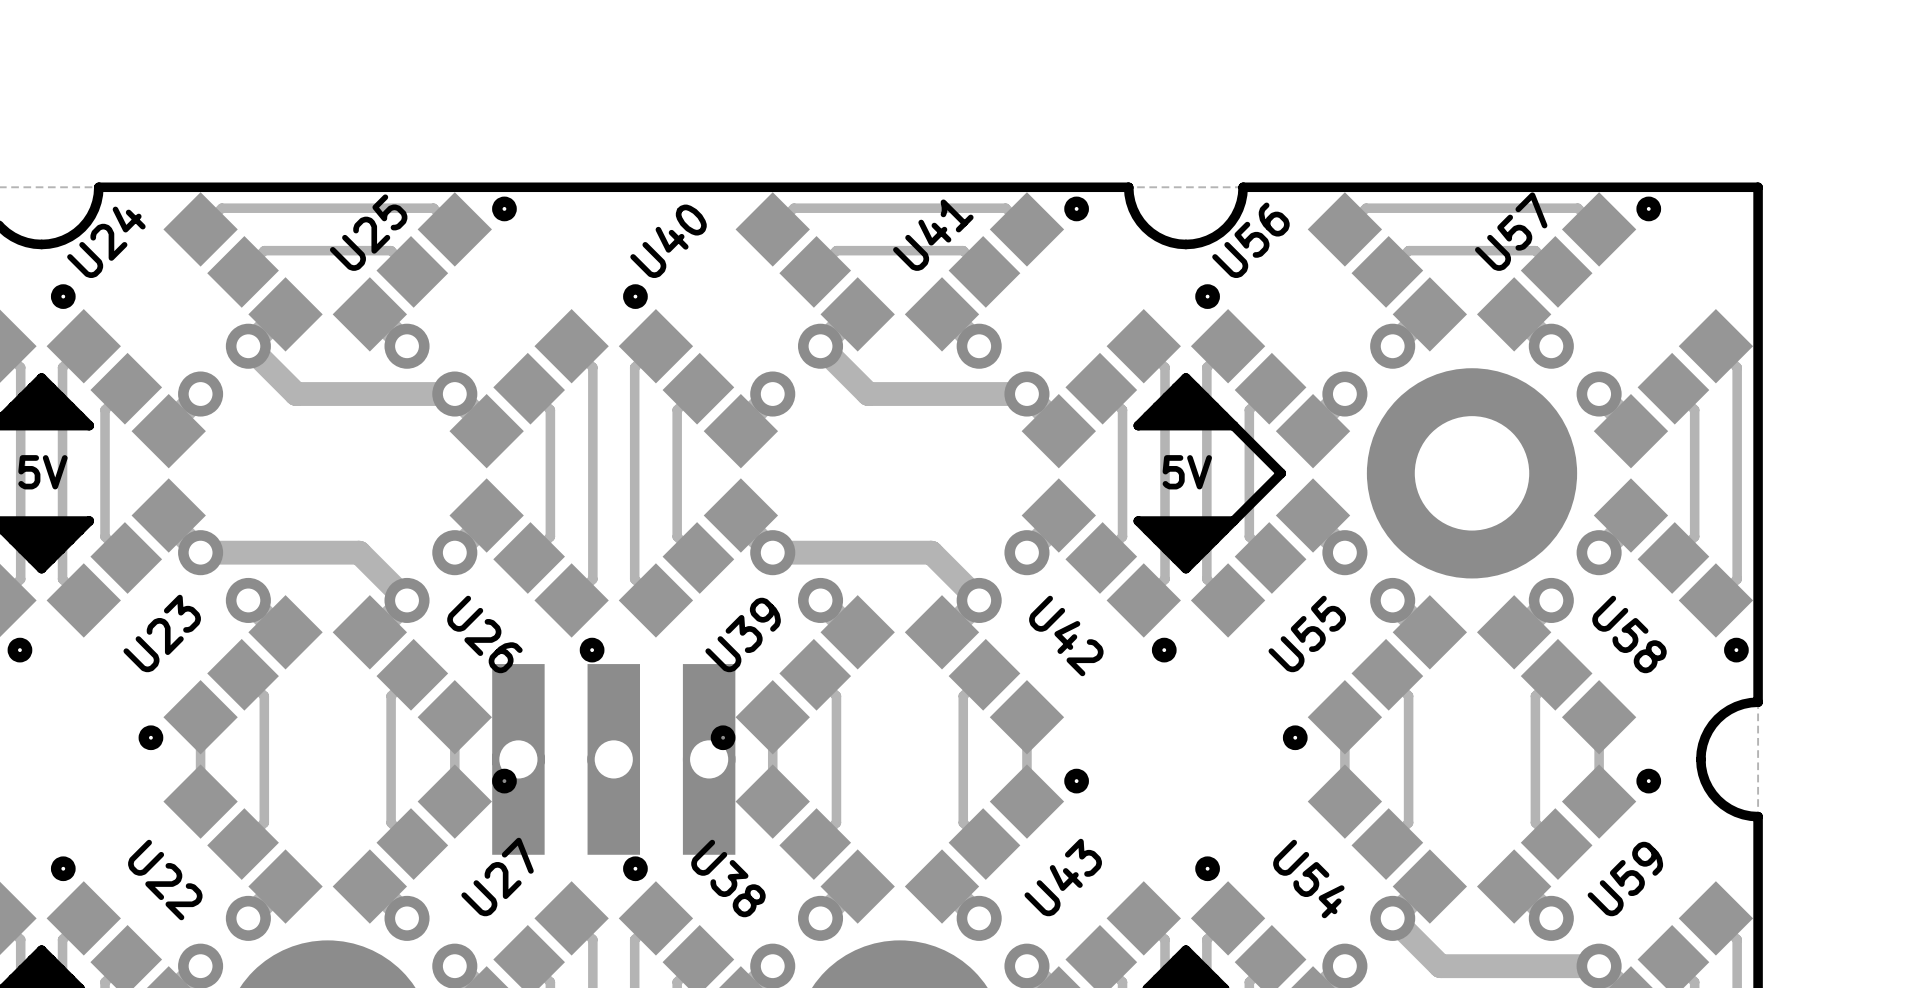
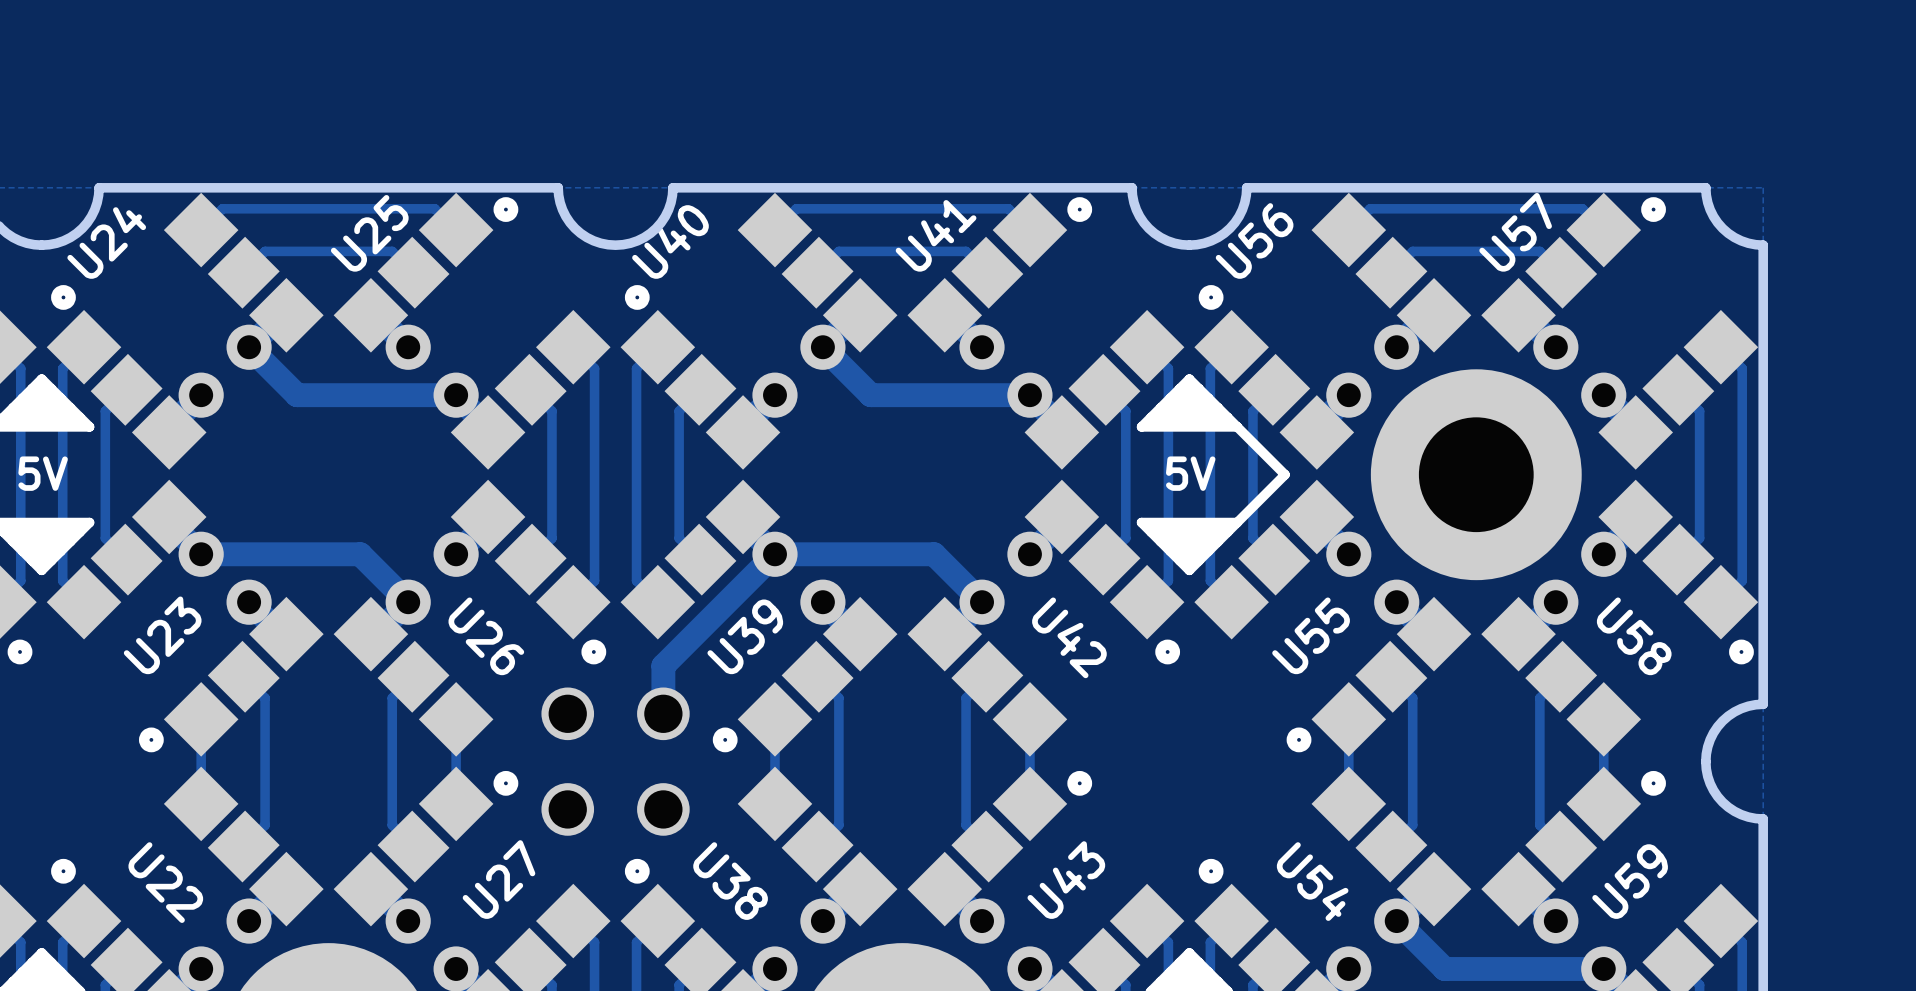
board edge: (556, 187) (670, 187) -> (558, 187) (562, 209) (574, 228) (593, 240) (615, 245) (637, 240) (656, 228) (668, 209) (672, 187)
board edge: (1700, 187) (1758, 187) (1758, 244) -> (1705, 187) (1710, 209) (1722, 228) (1741, 240) (1763, 245)
track: none -> (774, 554) (663, 665) (663, 713)
part footprint: [492, 664, 736, 855] -> [541, 687, 690, 836]

